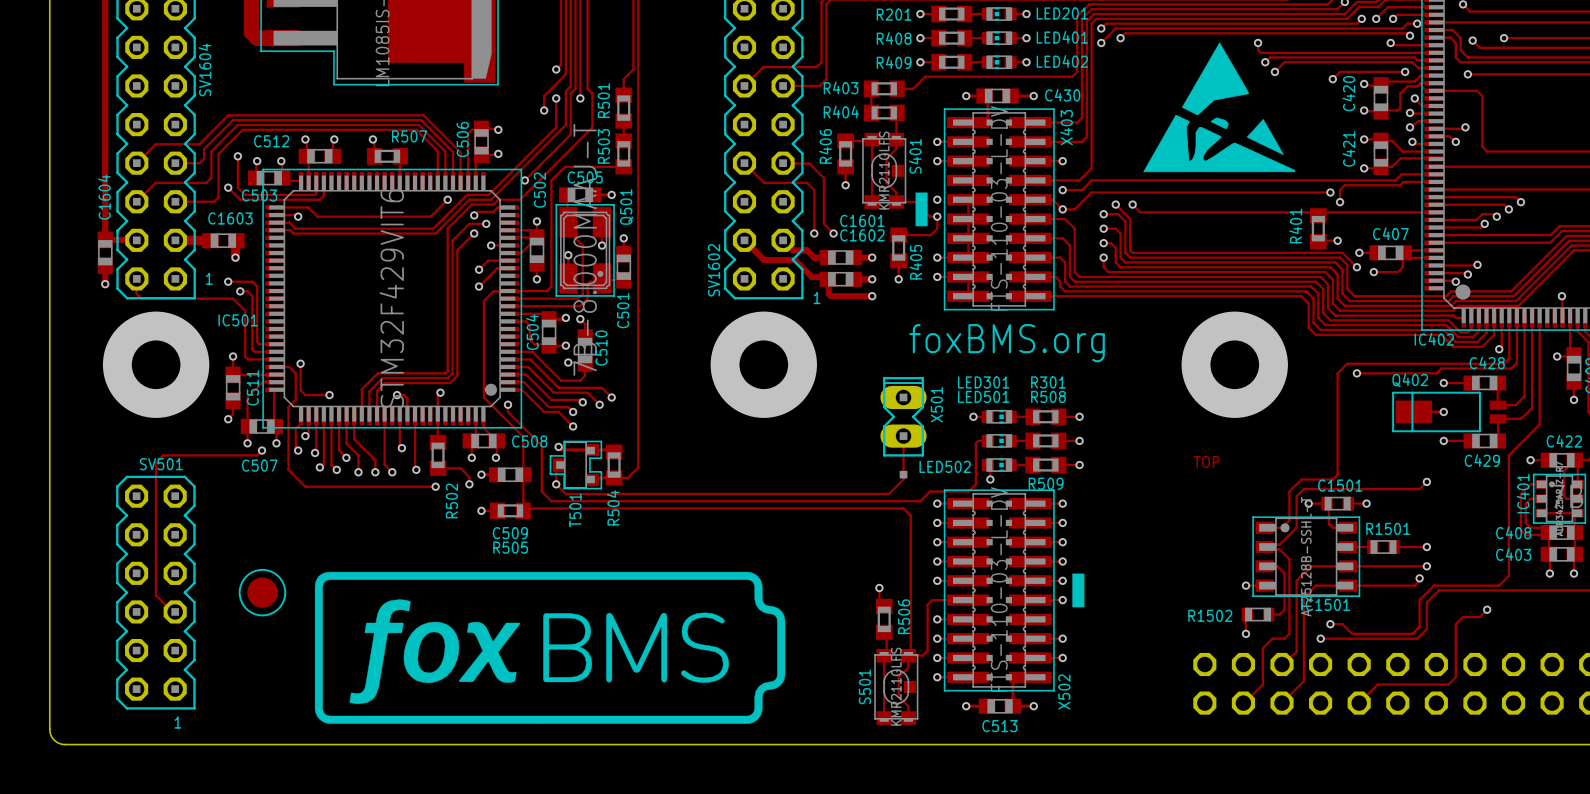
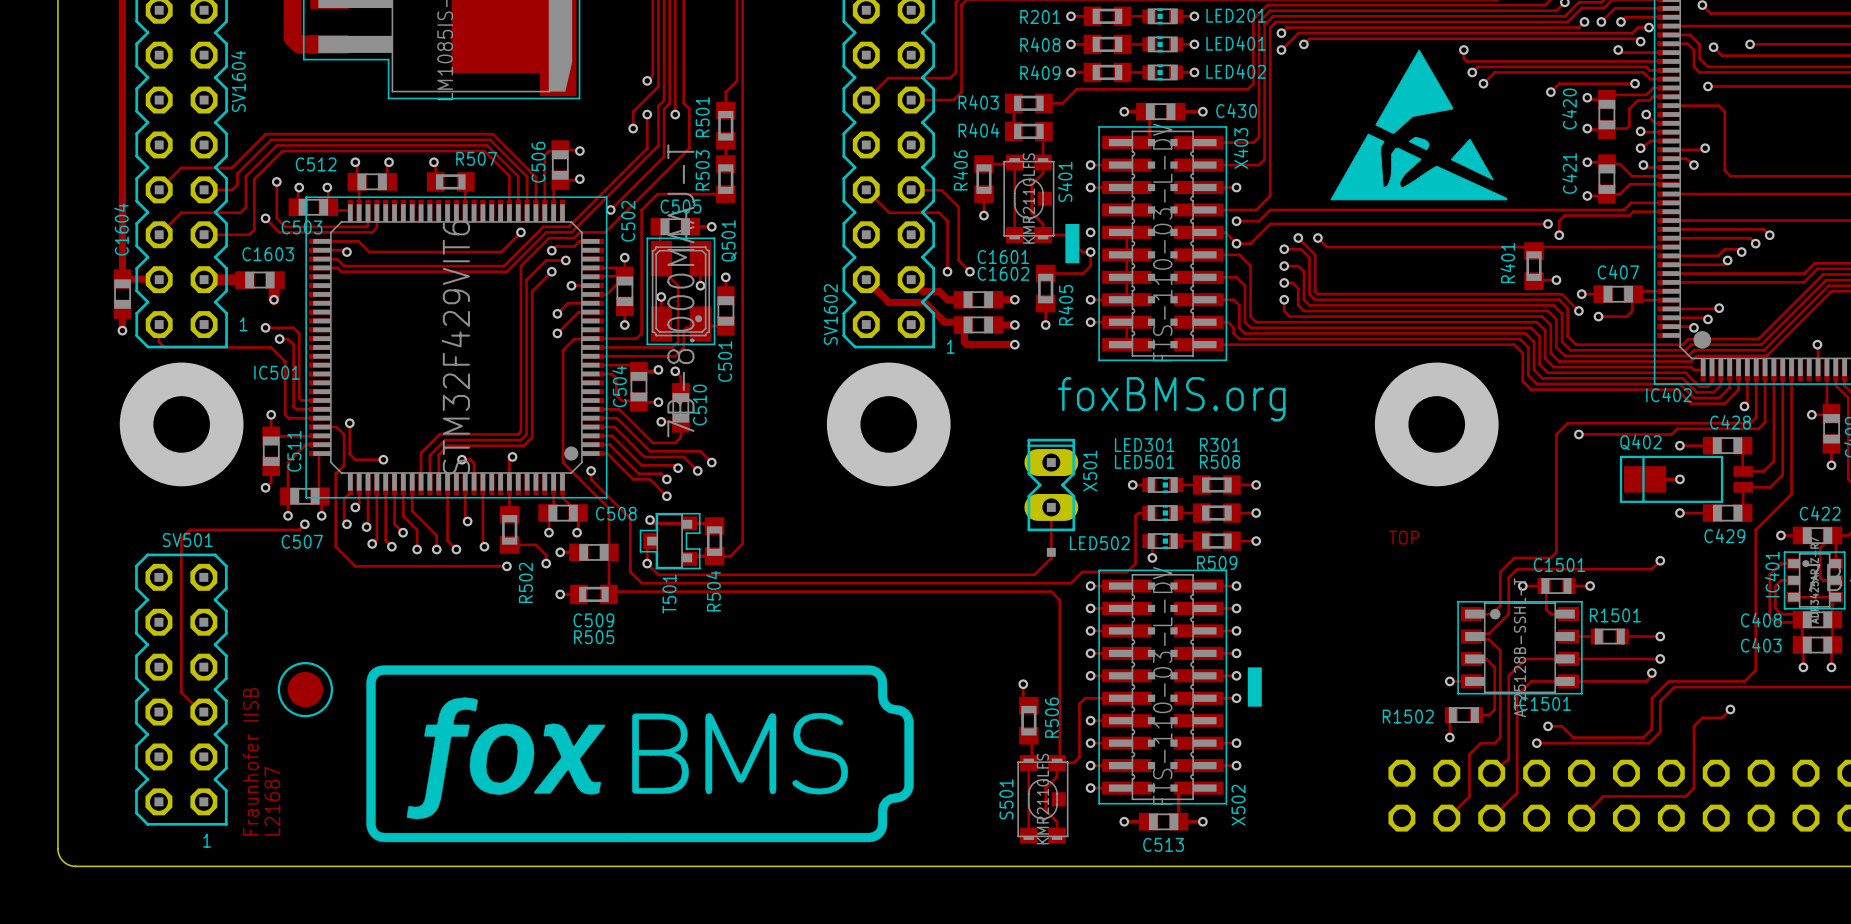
text: none -> Fraunhofer IISB (250, 761)
text: none -> L21687 (272, 801)

